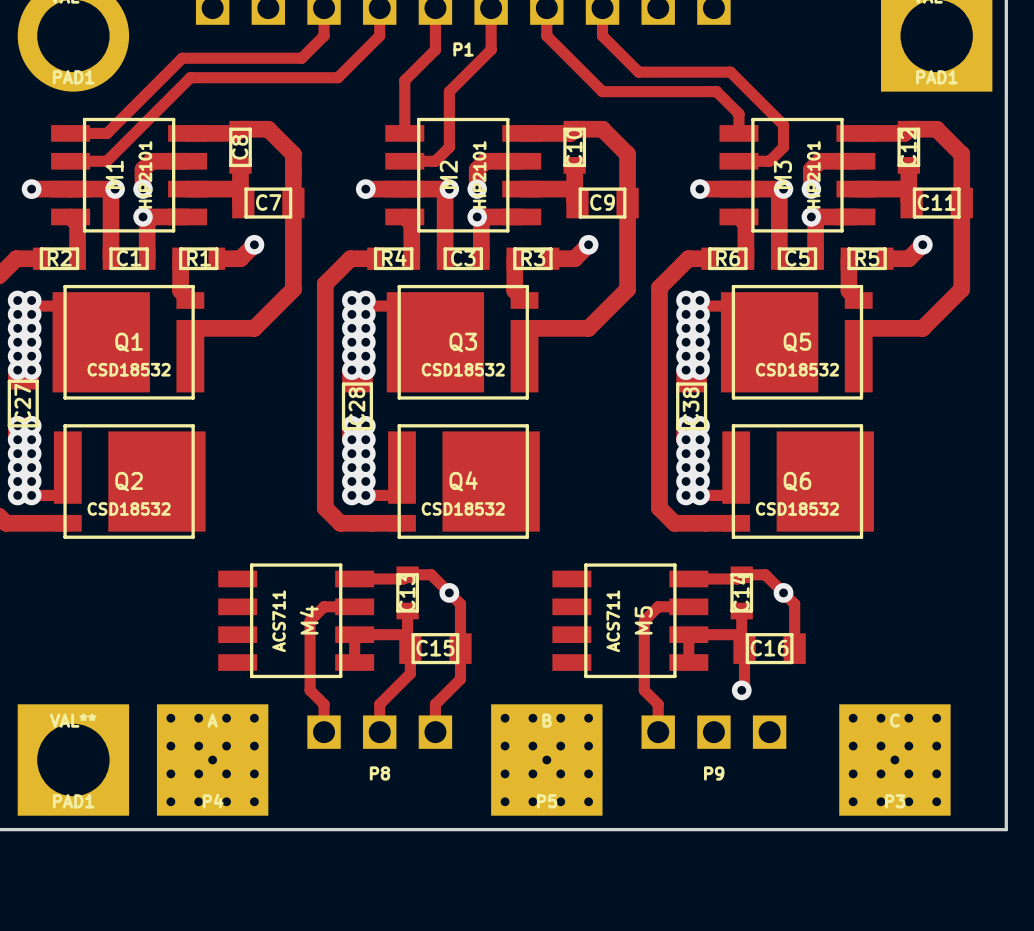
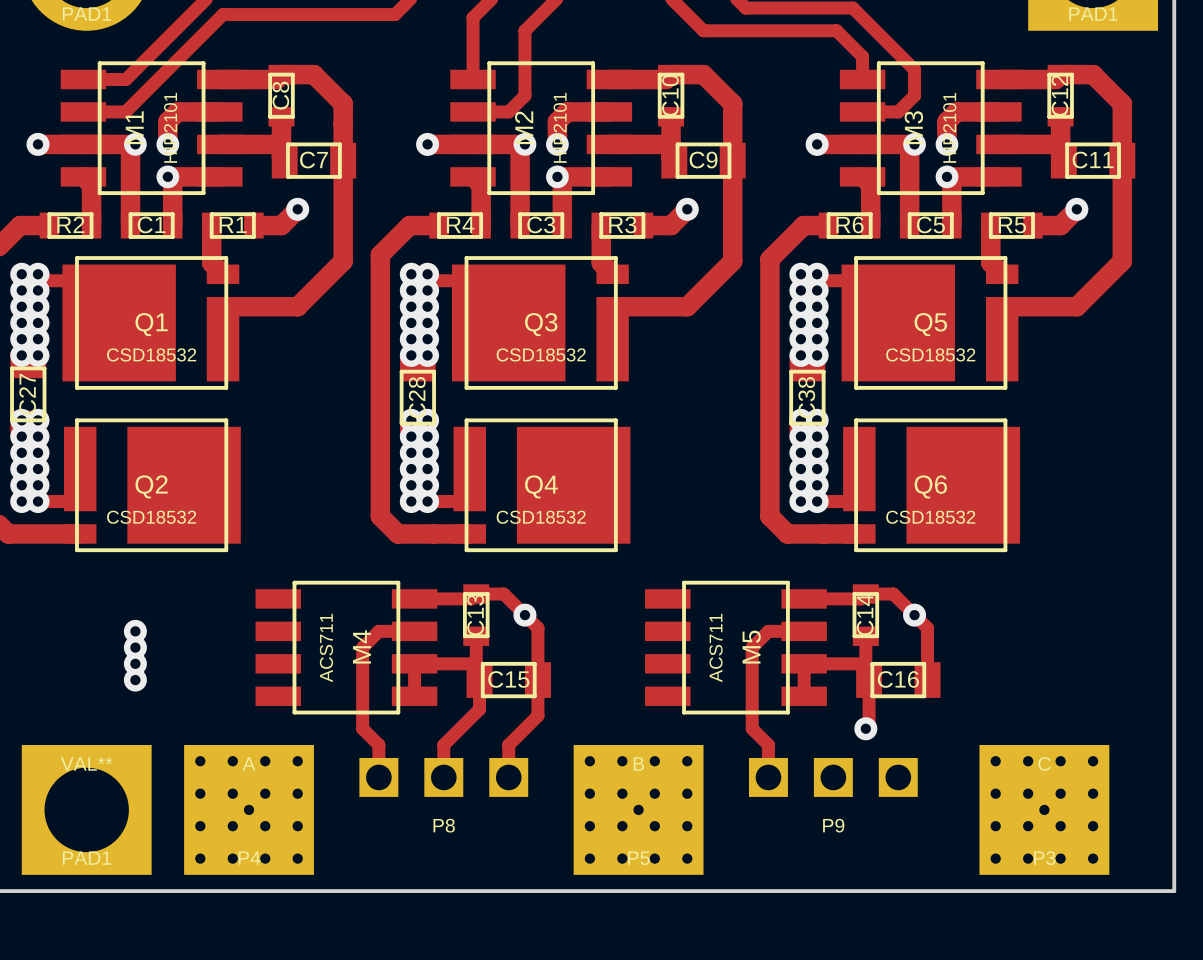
via: none -> (135, 631)
via: none -> (135, 647)
via: none -> (135, 663)
via: none -> (135, 680)

